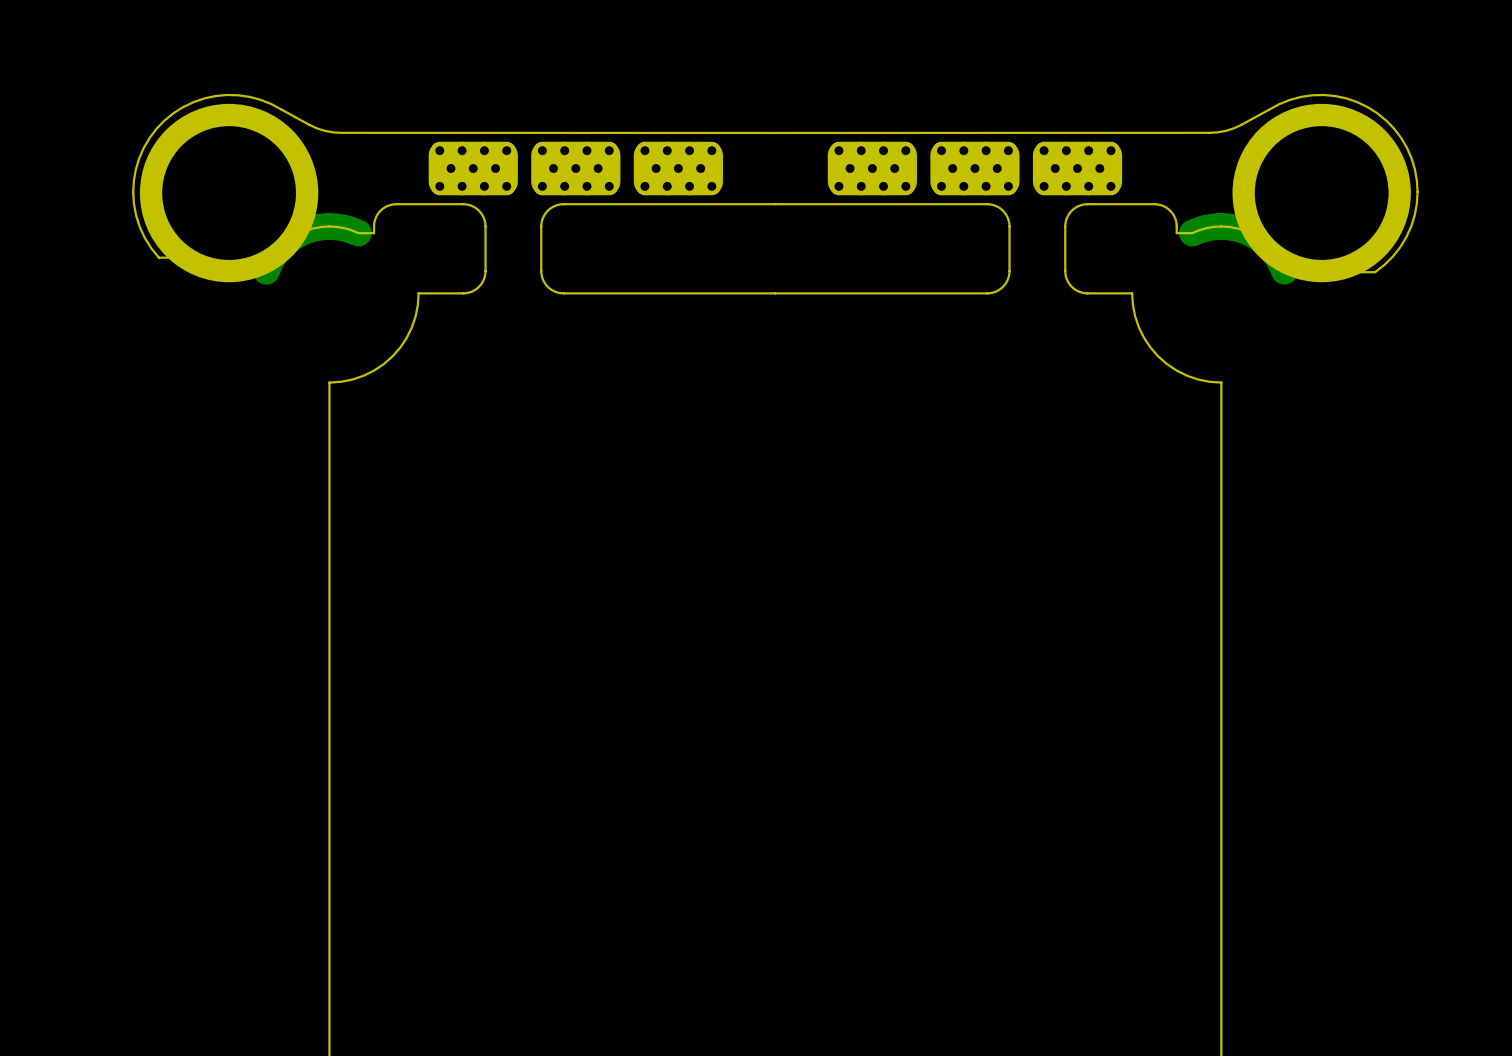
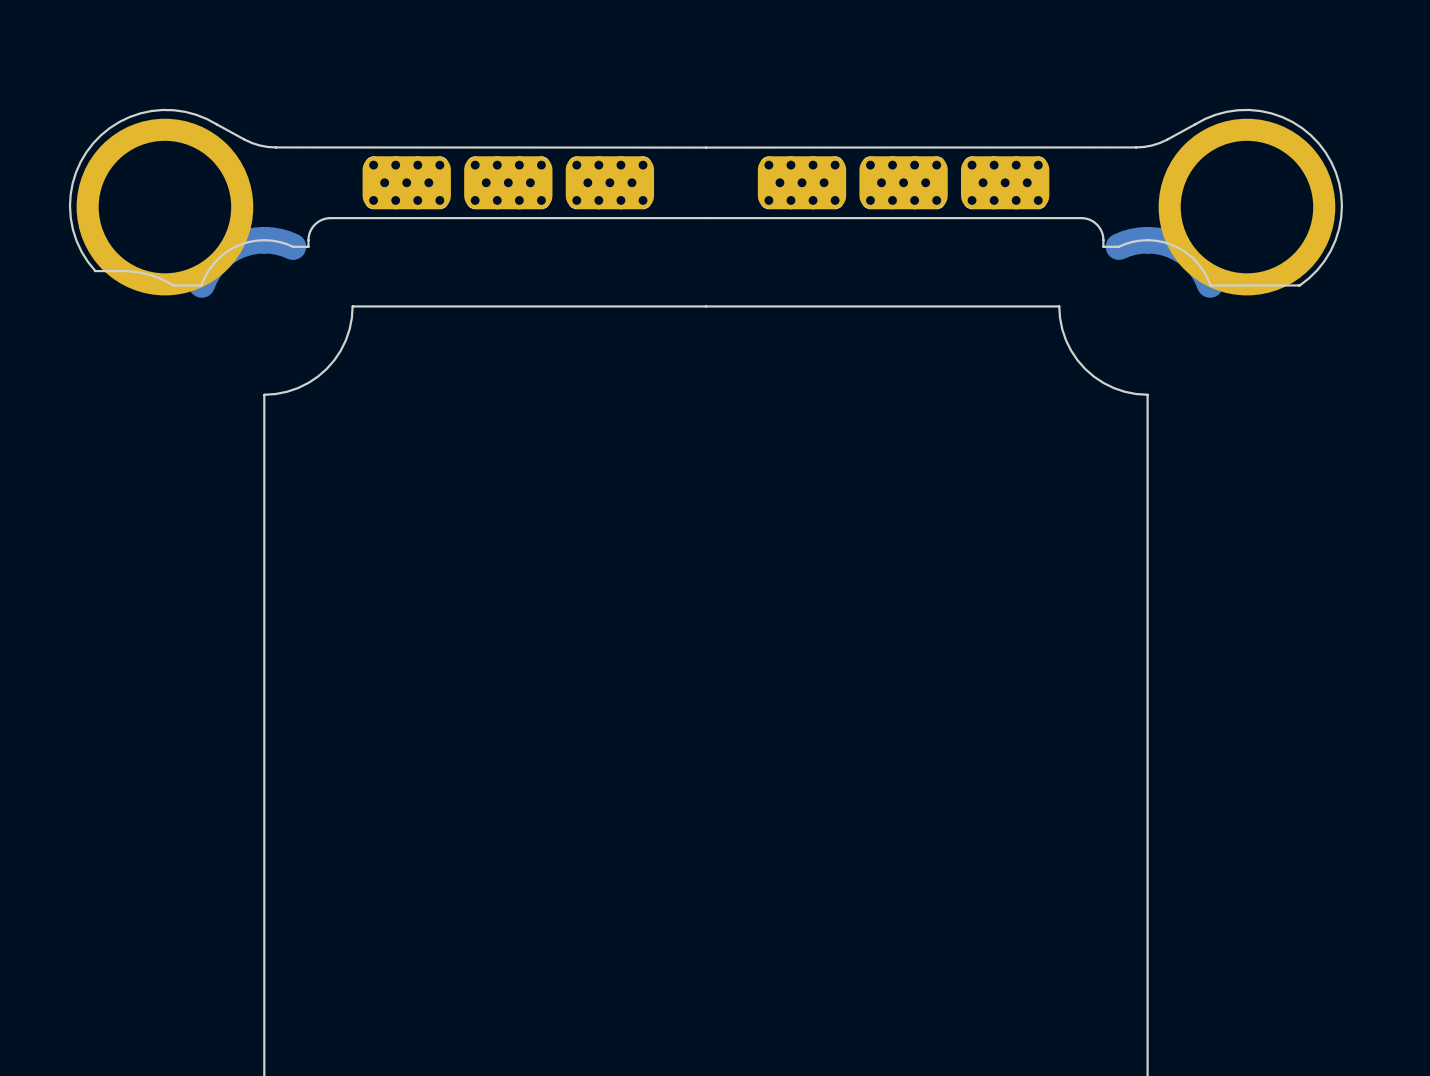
board edge: (463, 204) (471, 205) (478, 210) (483, 217) (485, 226) (484, 276) (476, 288) (463, 293) -> (396, 218) (496, 218)
board edge: (563, 204) (549, 208) (542, 220) (541, 271) (542, 279) (547, 286) (555, 291) (563, 293) -> (396, 306) (496, 306)
board edge: (987, 204) (1000, 208) (1008, 220) (1009, 271) (1007, 279) (1002, 286) (995, 291) (987, 293) -> (1015, 306) (915, 306)
board edge: (1087, 204) (1079, 205) (1071, 210) (1066, 217) (1065, 226) (1066, 276) (1073, 288) (1087, 293) -> (1015, 218) (915, 218)

